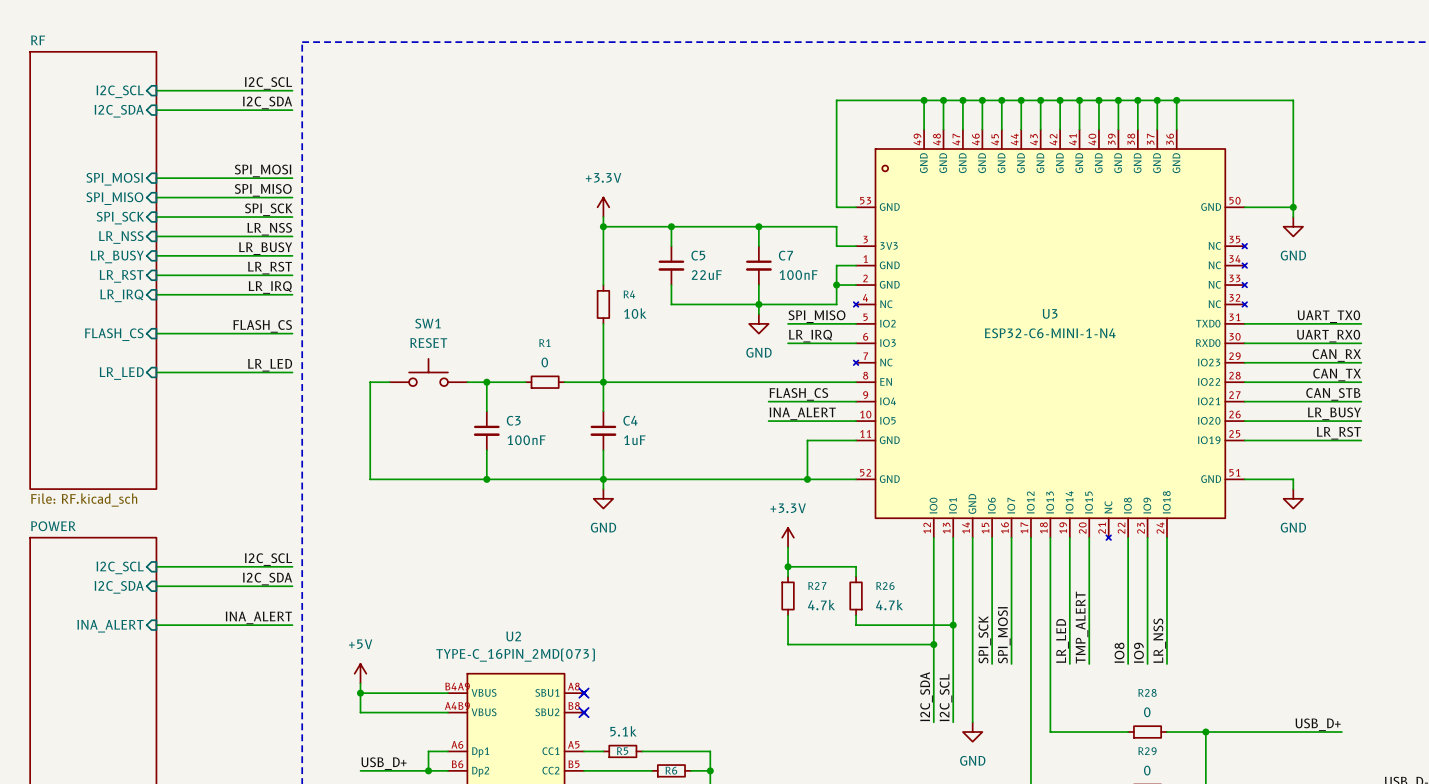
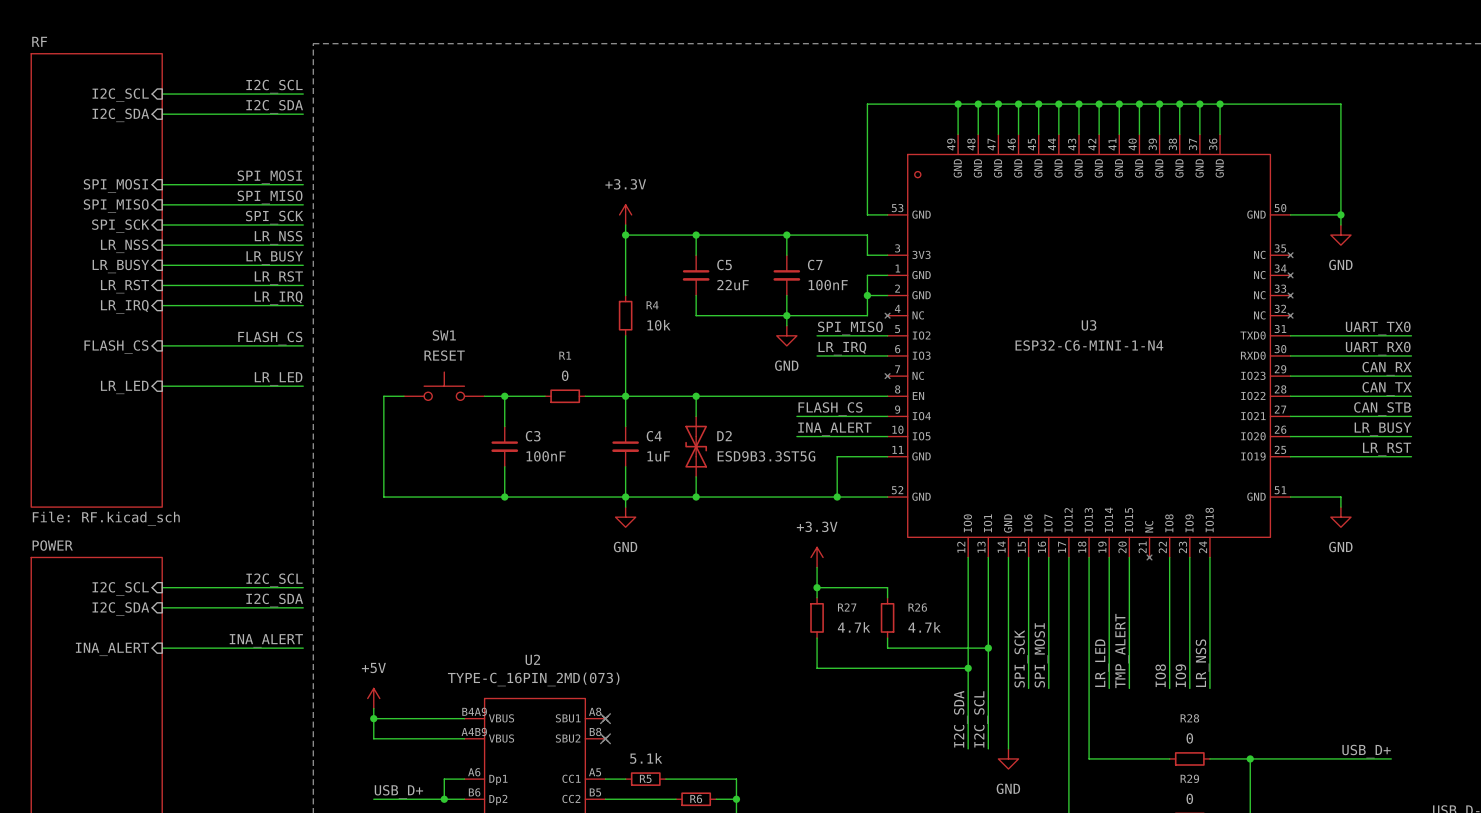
wire: none -> (696, 396) (696, 416)
junction: none -> (696, 396)
D2: none -> ESD9B3.3ST5G (696, 446)
wire: none -> (696, 476) (696, 497)
junction: none -> (696, 497)

